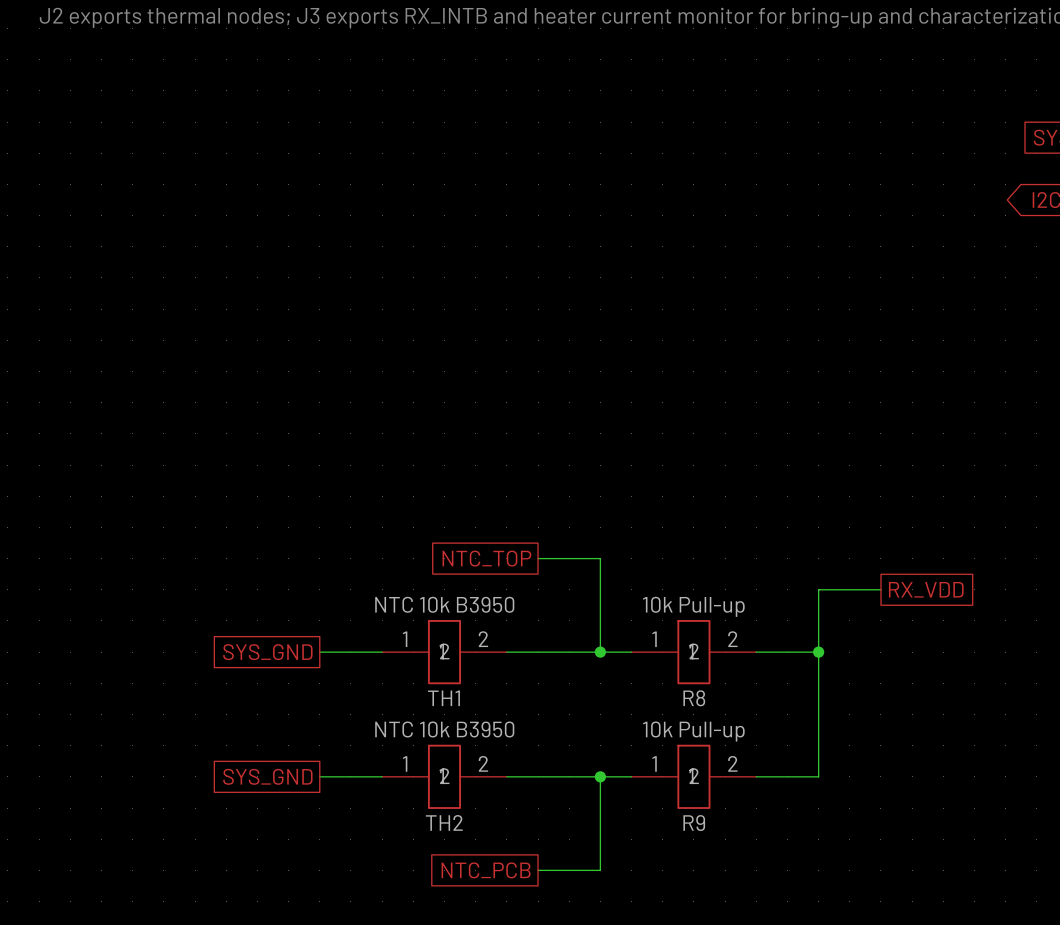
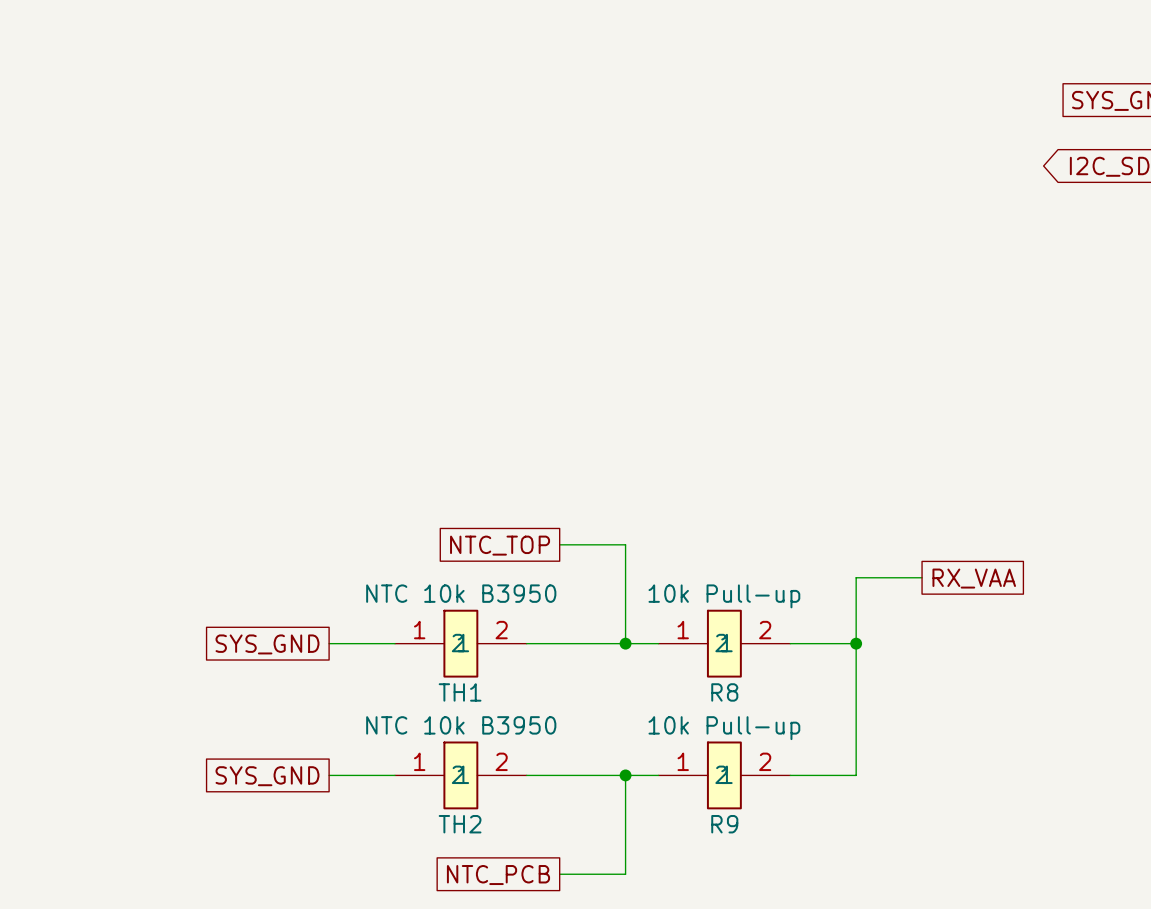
global label: RX_VDD (926, 589) -> RX_VAA (974, 578)

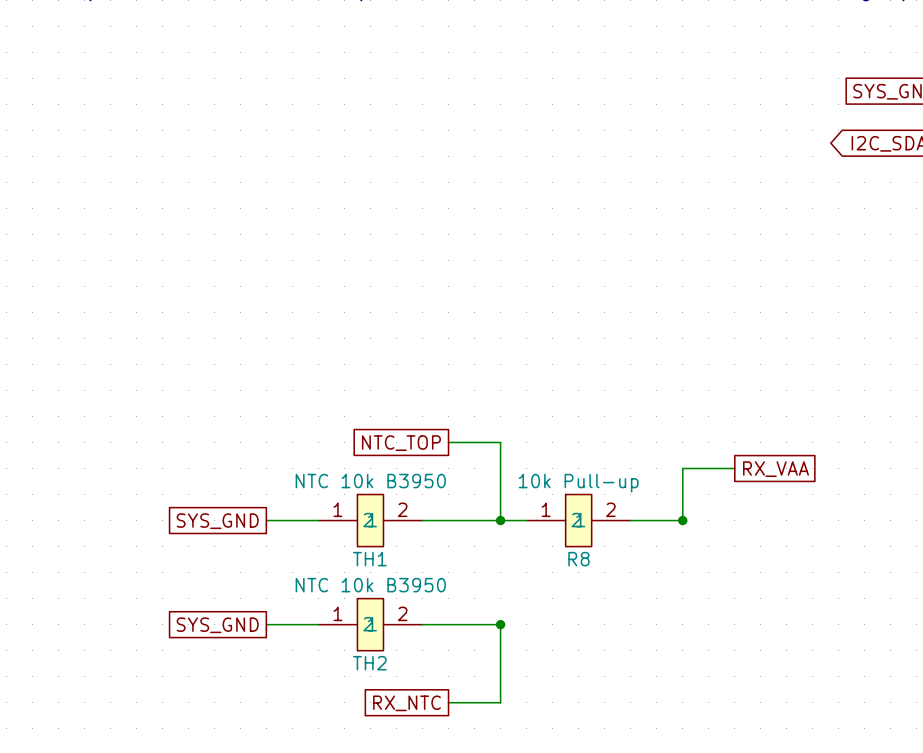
wire: (856, 643) (856, 775) (790, 775) -> none
wire: (625, 775) (658, 775) -> none
R9: 10k Pull-up (724, 775) -> none
global label: NTC_PCB (498, 875) -> RX_NTC (406, 703)

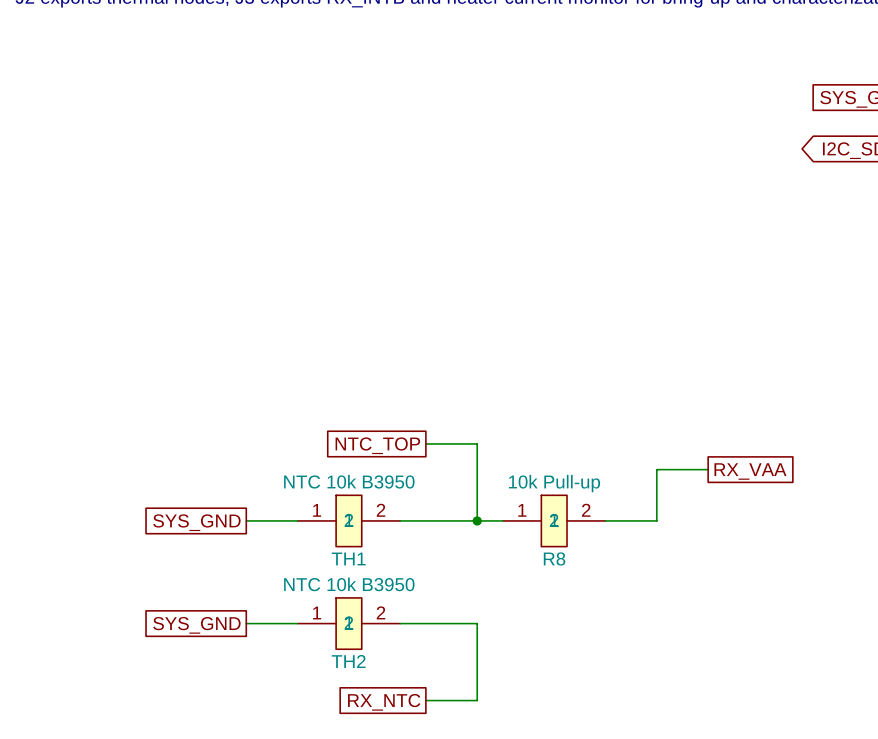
junction: (682, 520) -> none
junction: (500, 624) -> none

